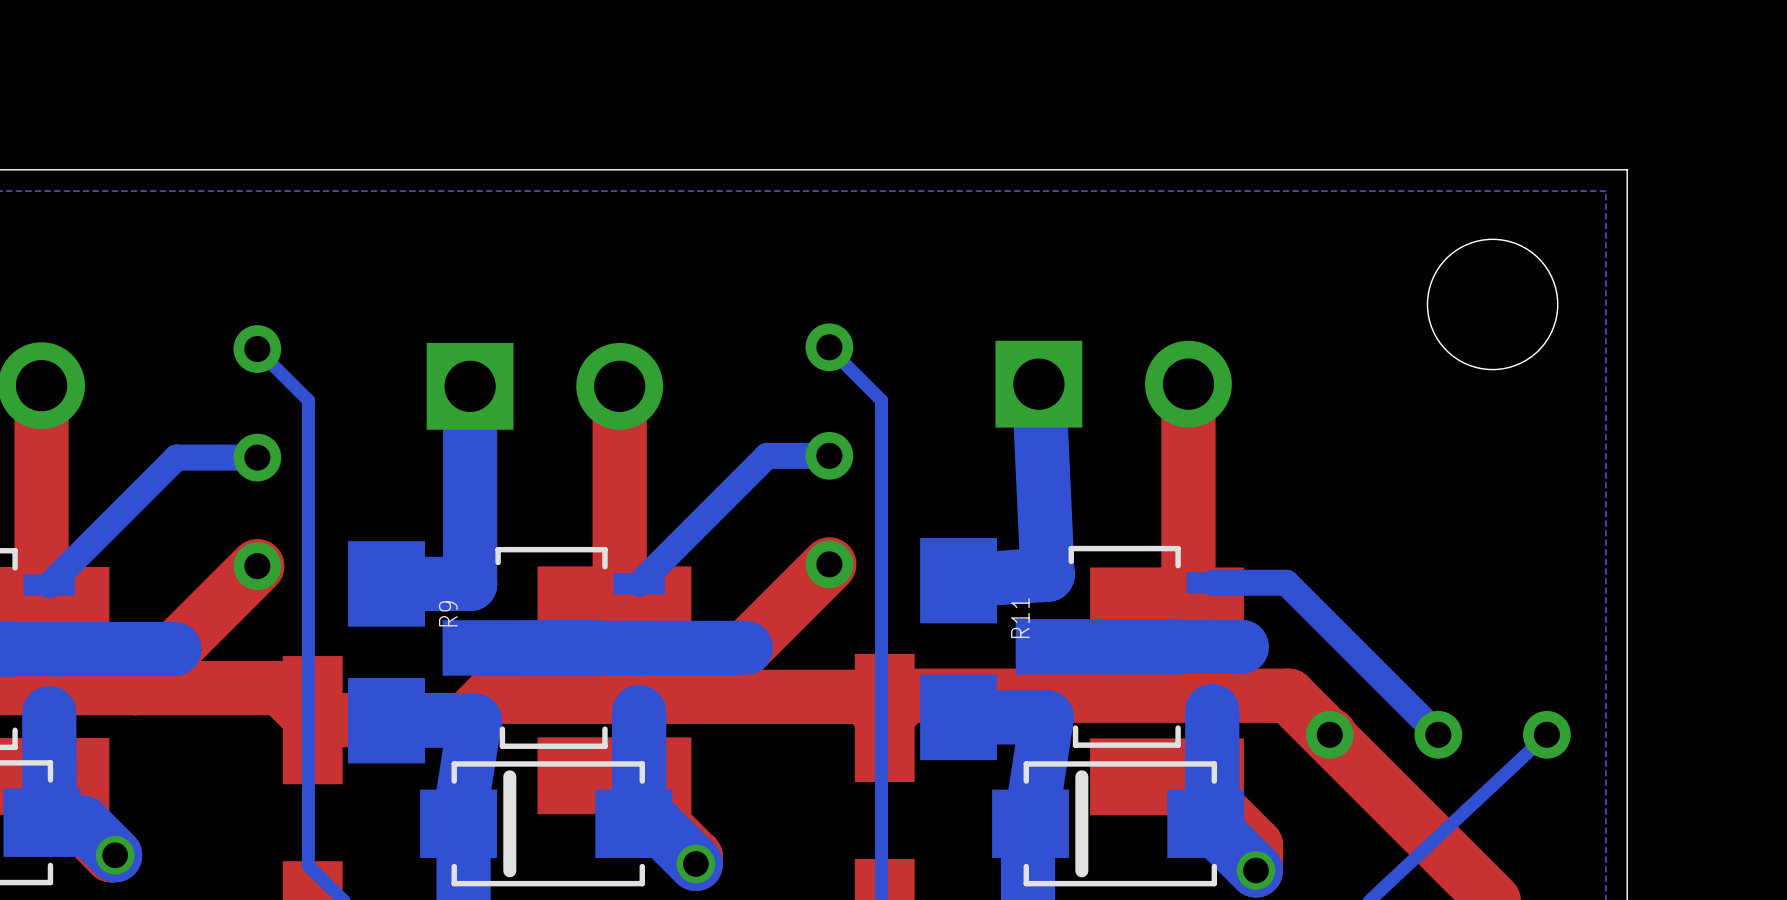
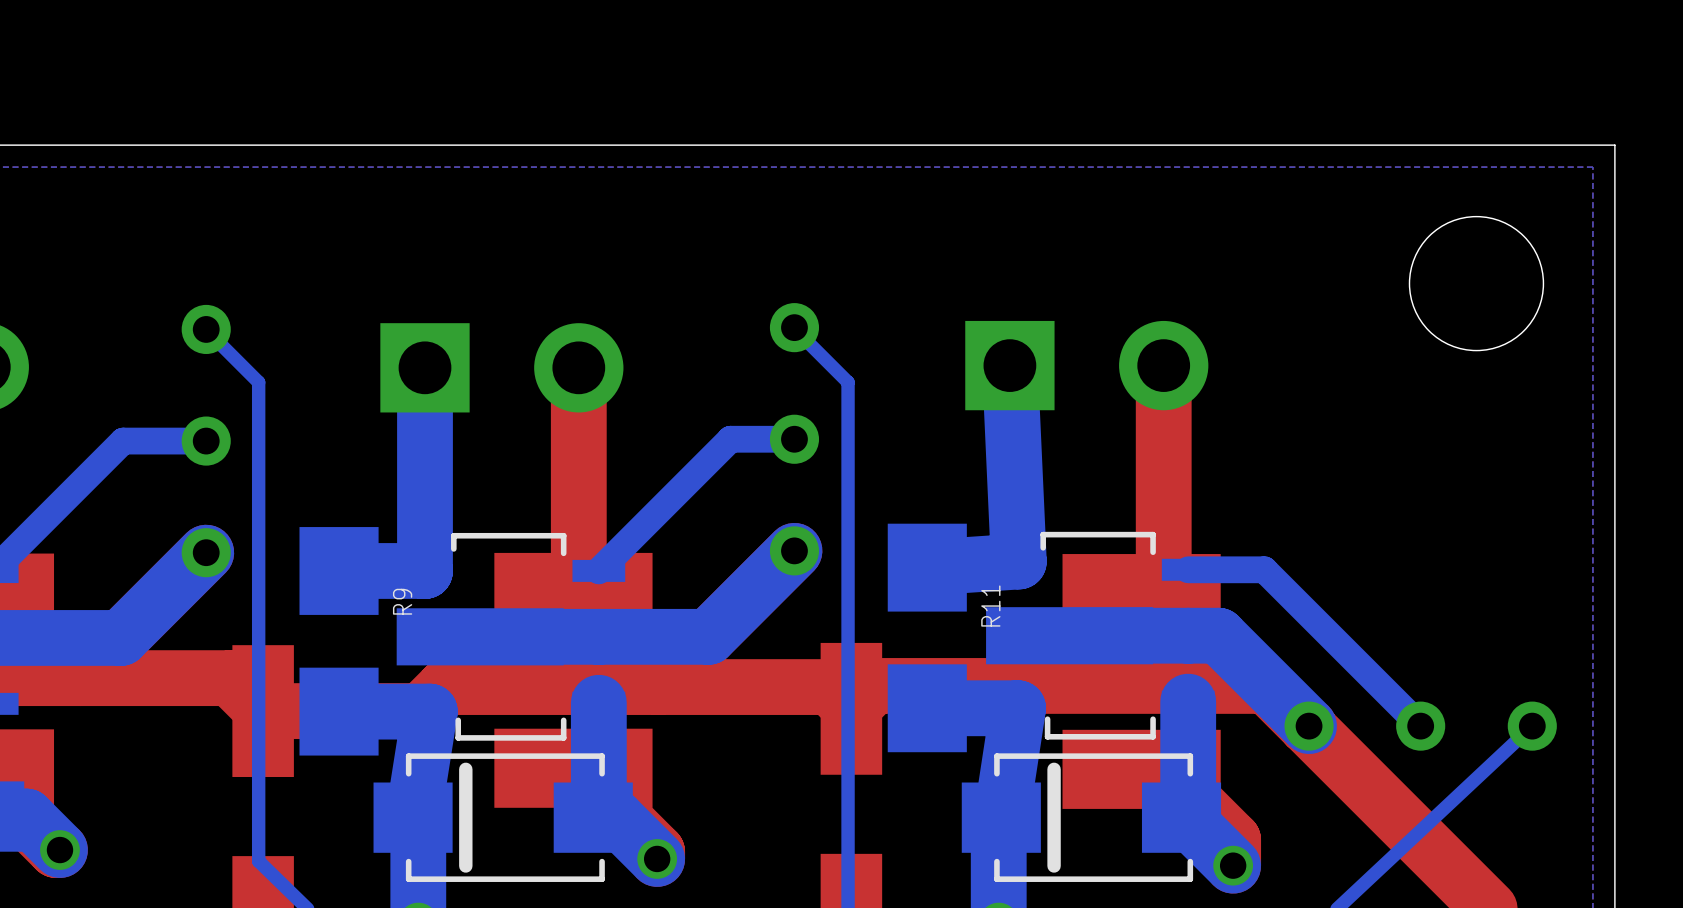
bottom track: none -> (794, 550) (708, 636)
bottom track: none -> (206, 552) (120, 637)
bottom track: none -> (1218, 635) (1309, 726)

